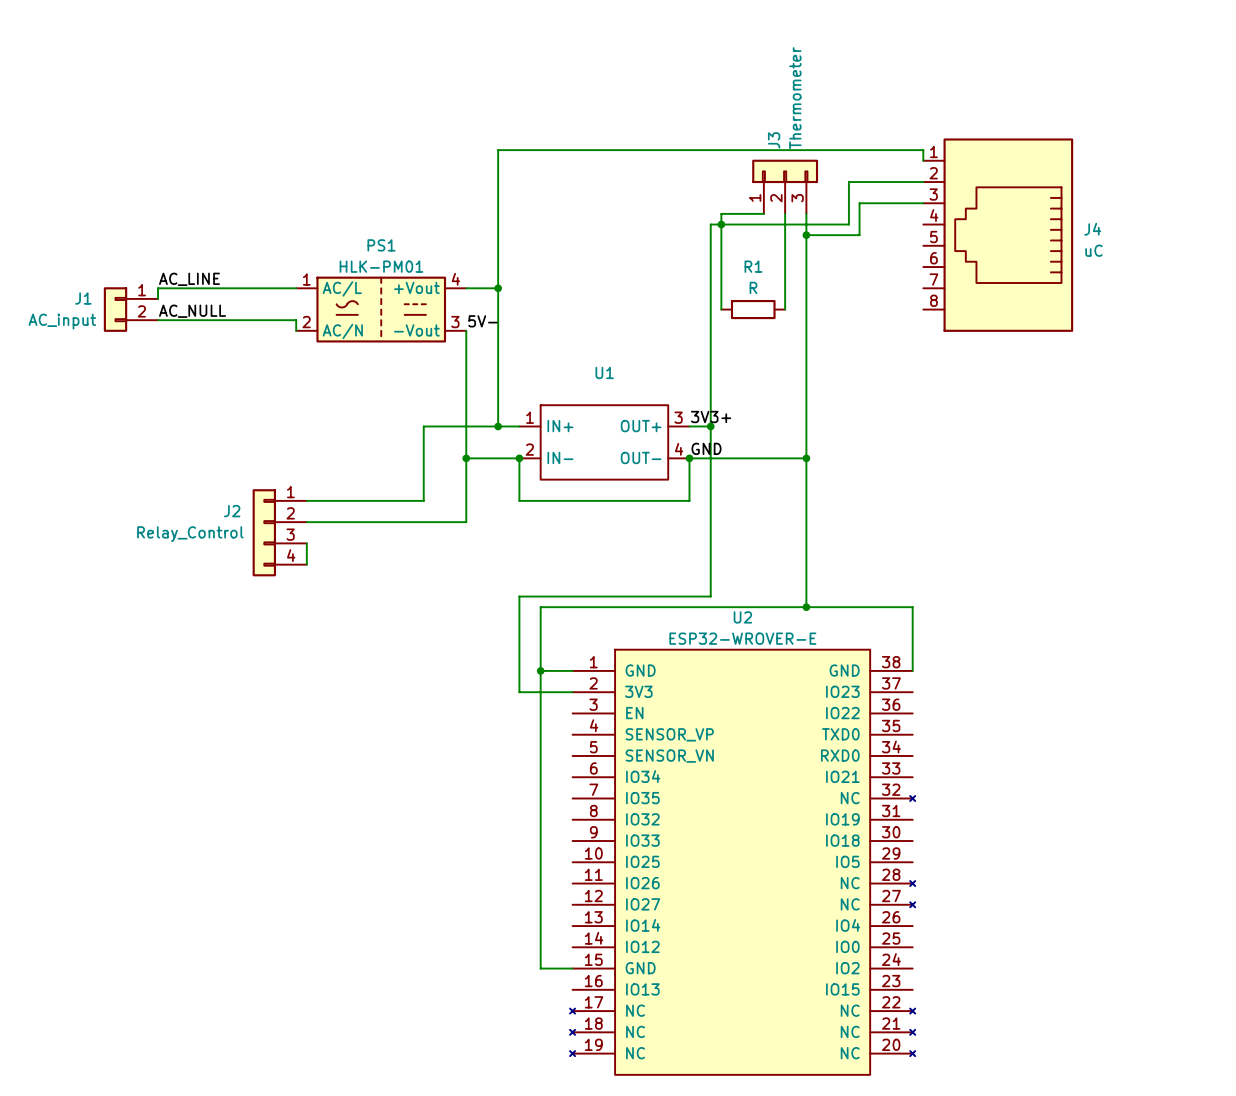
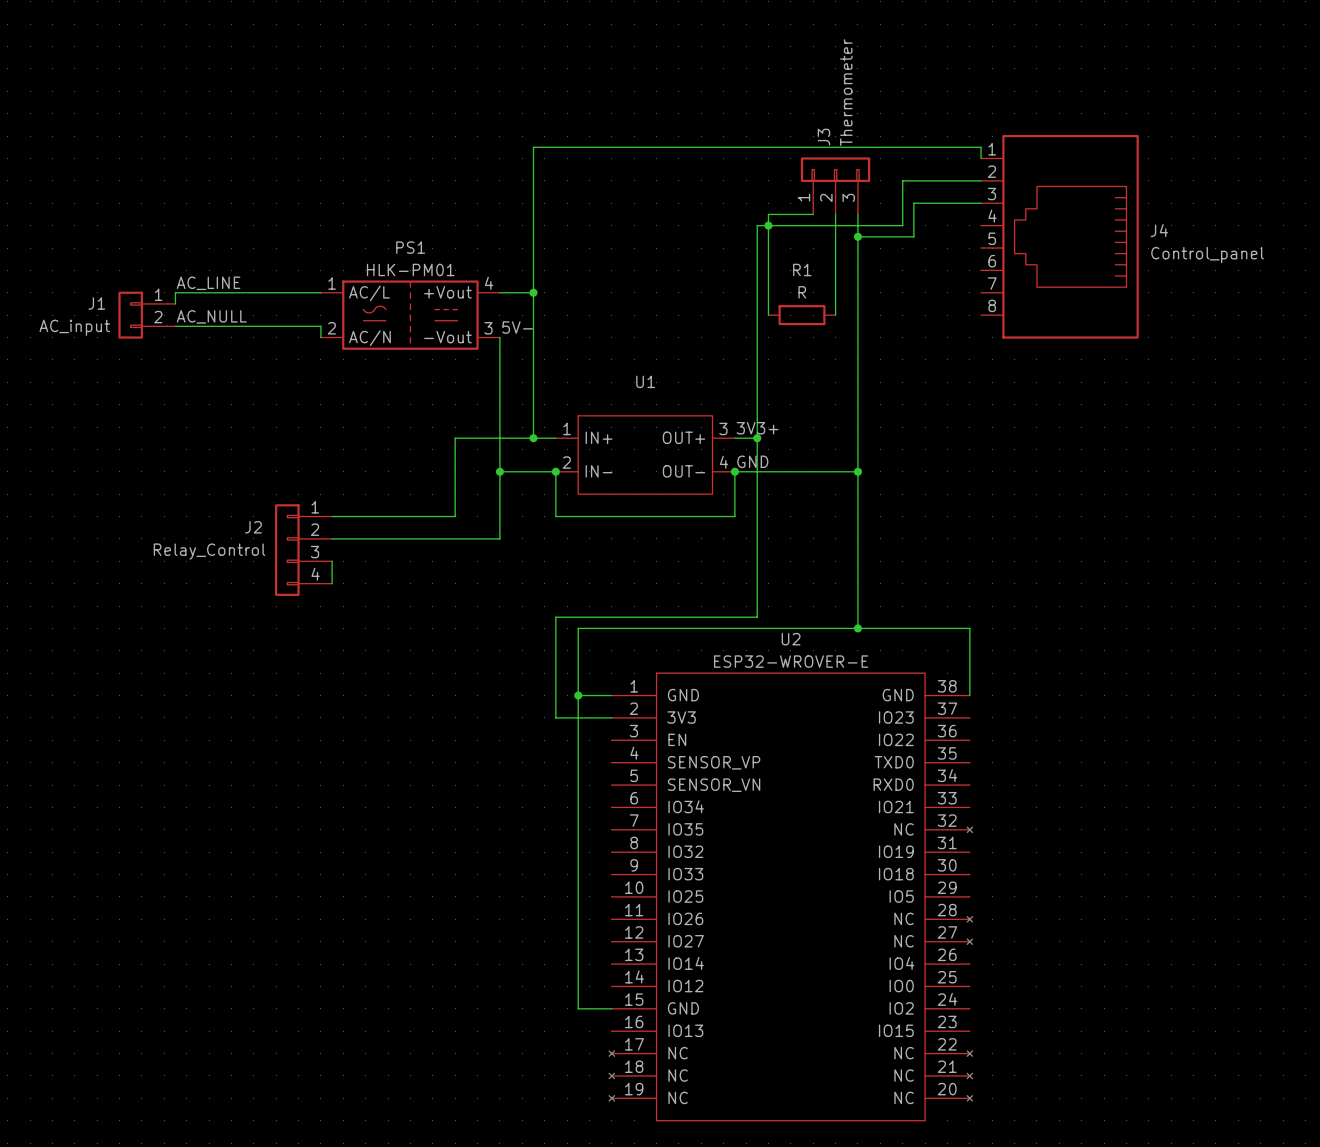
J4 value: uC (1093, 250) -> Control_panel (1207, 255)

